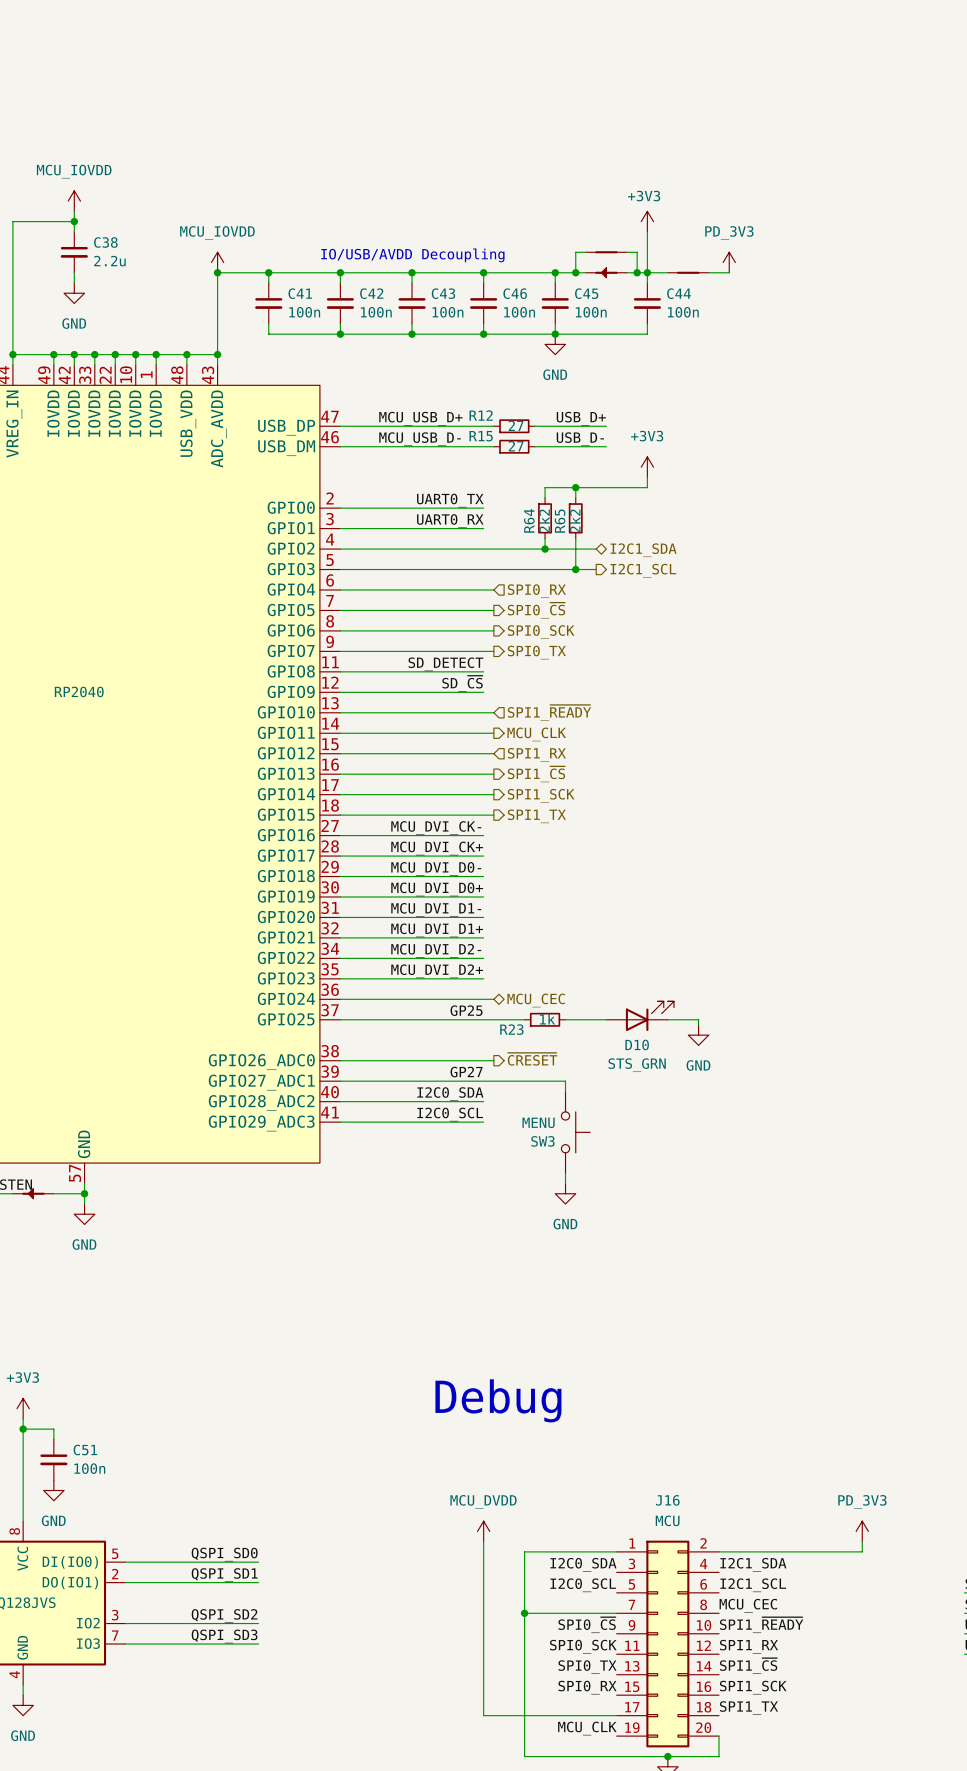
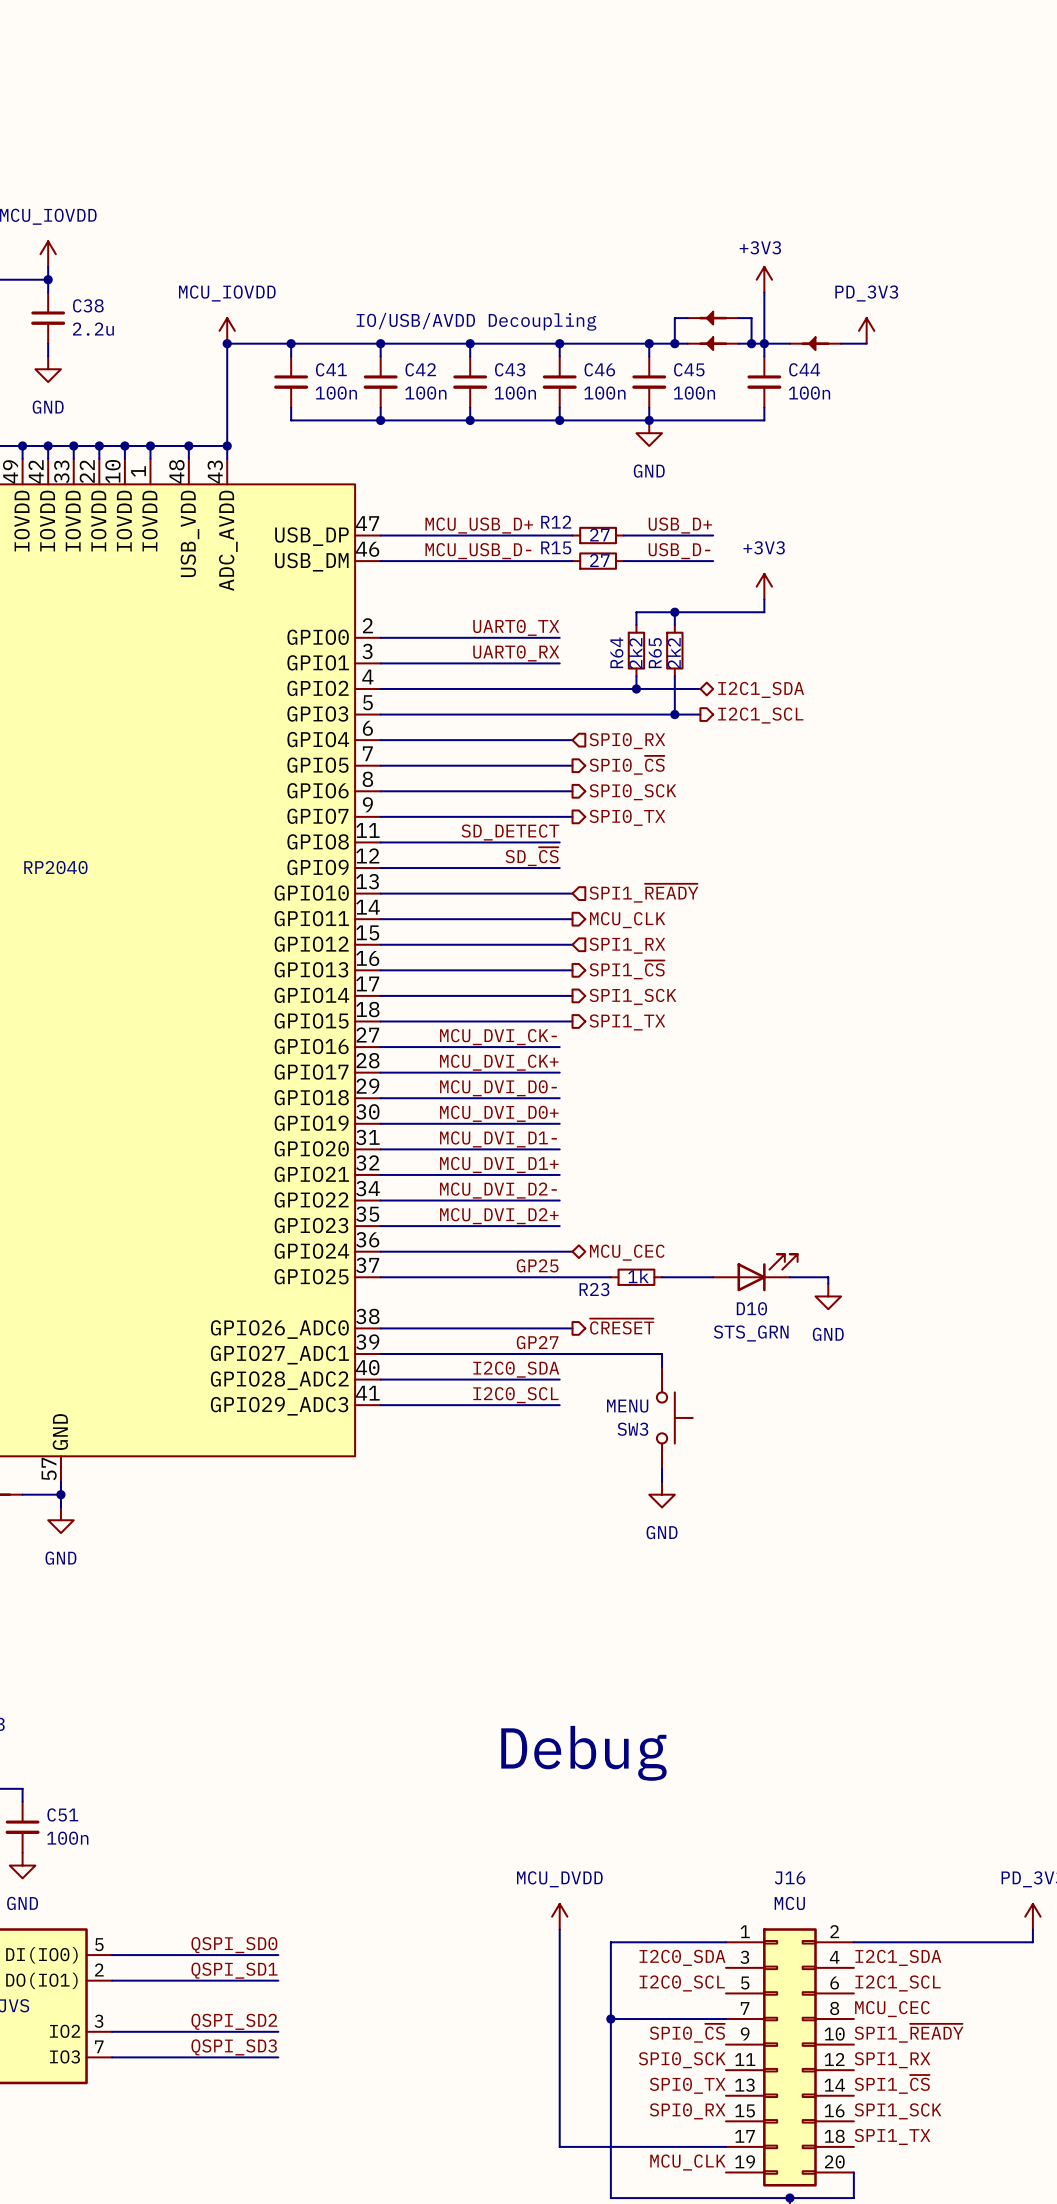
part symbol: [585, 251, 627, 254] -> [687, 311, 739, 325]
part symbol: [667, 271, 709, 274] -> [789, 337, 842, 351]

